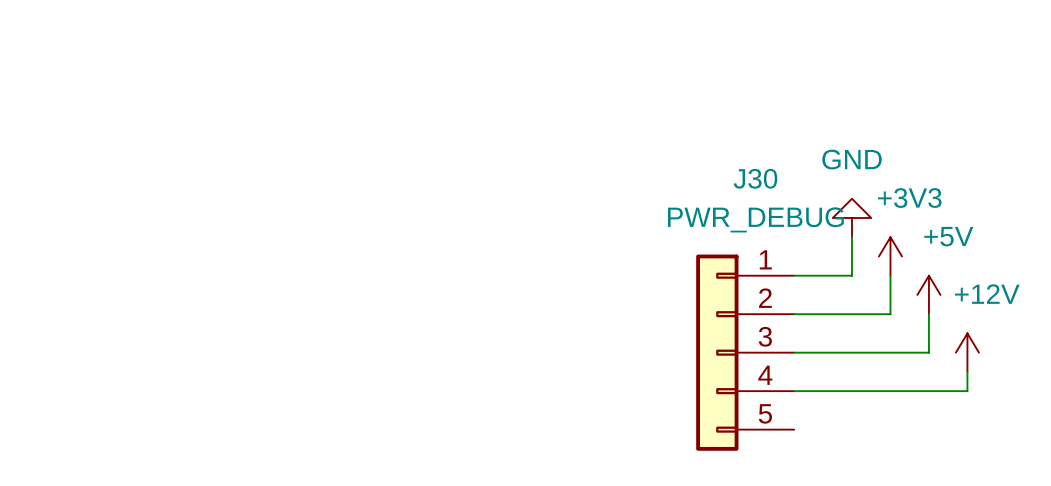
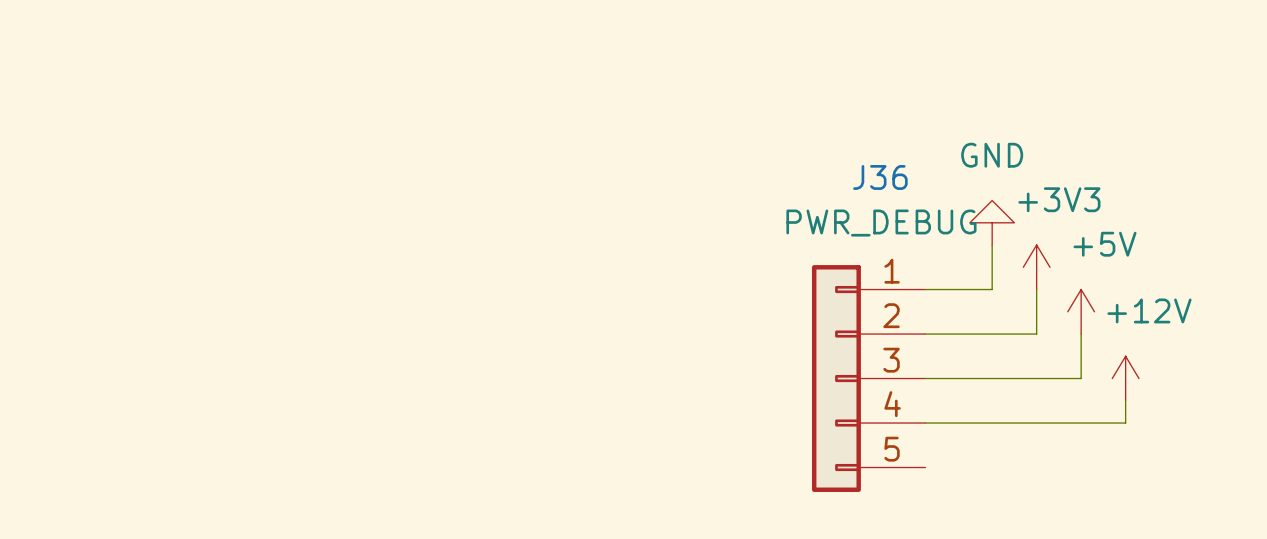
J30 name: J30 (755, 178) -> J36 (880, 177)

